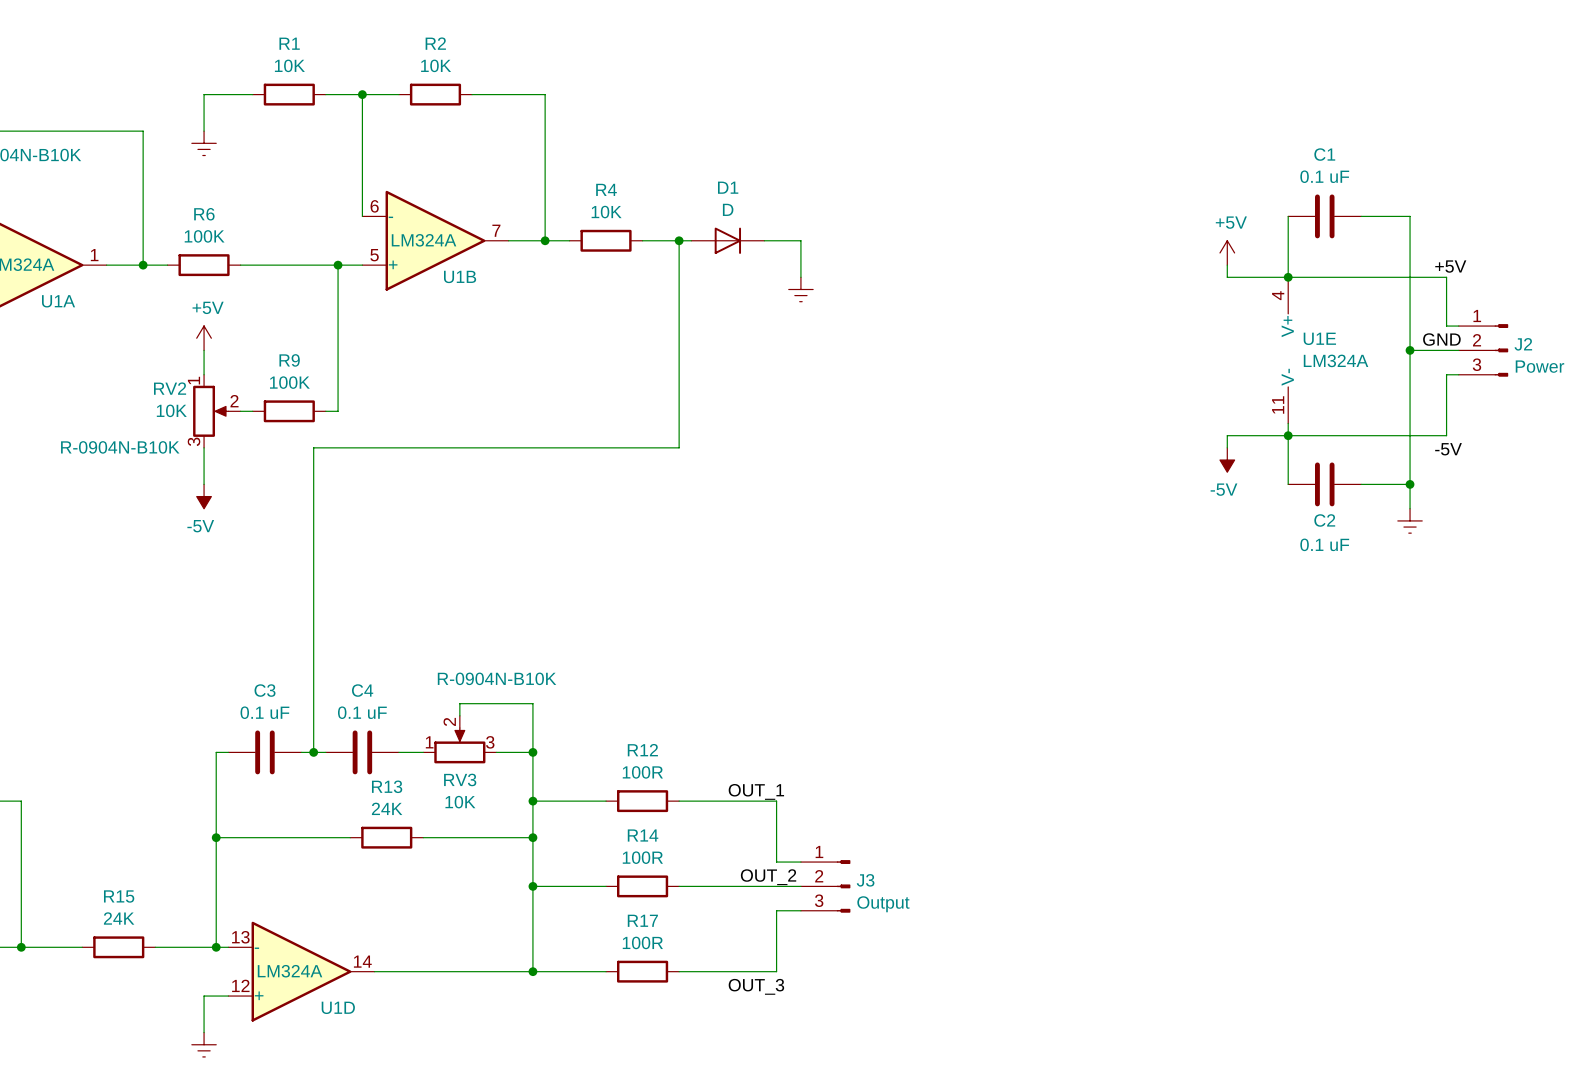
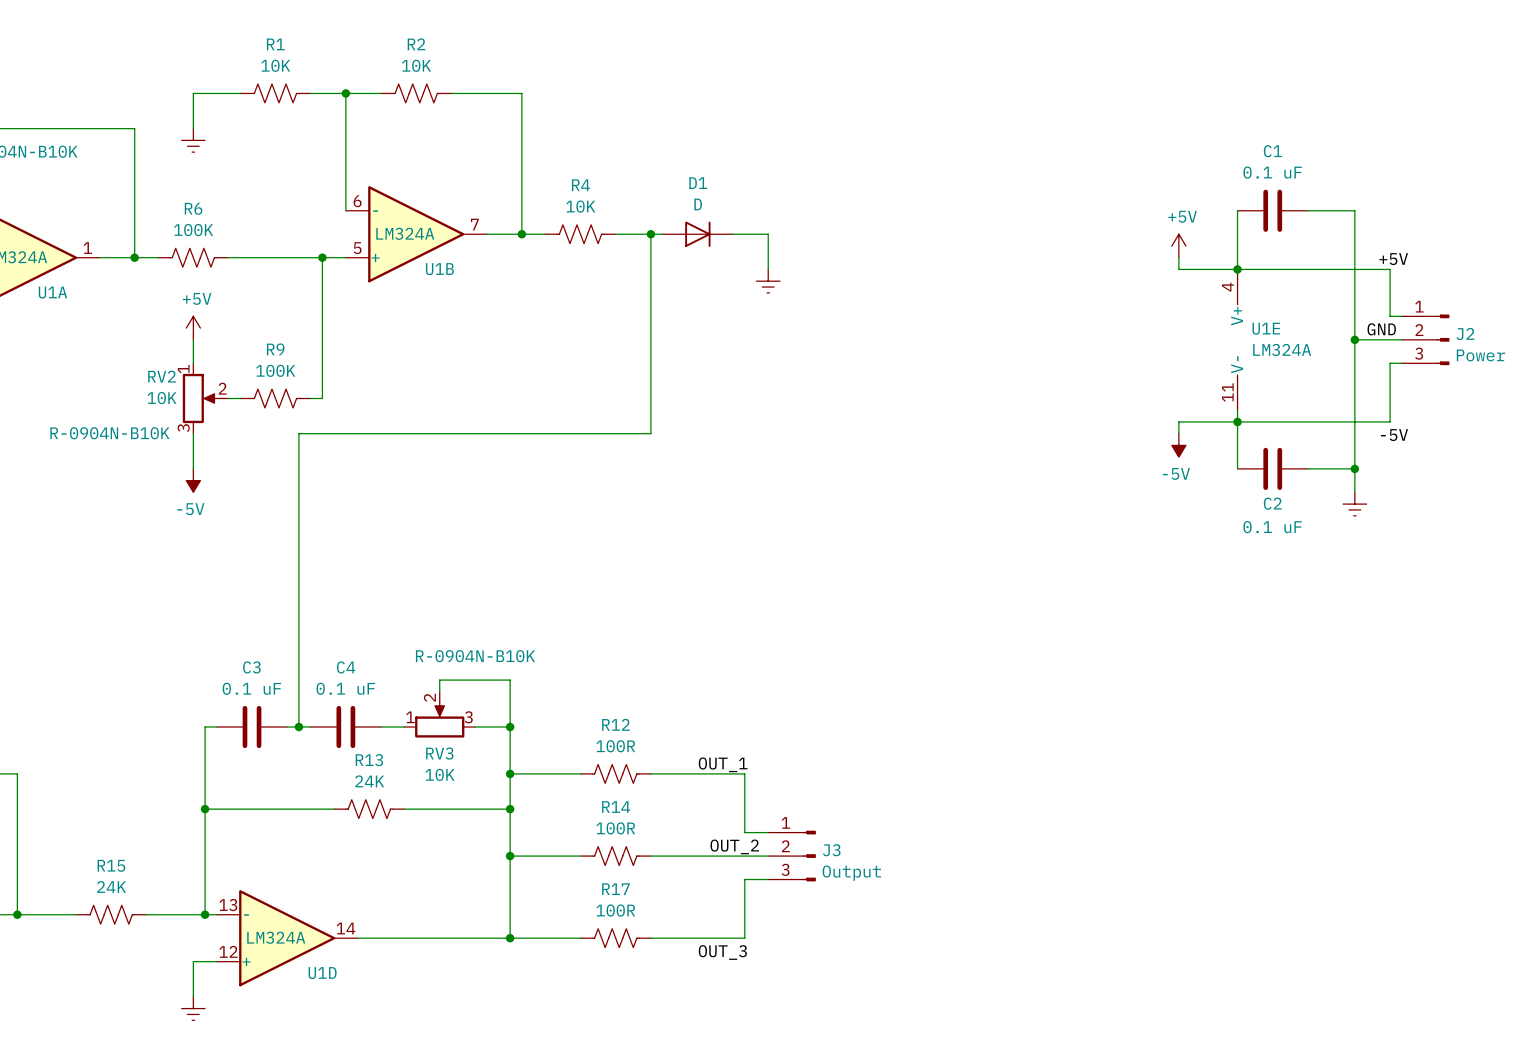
R1 symbol: [252, 83, 326, 106] -> [240, 84, 311, 103]
R2 symbol: [398, 83, 473, 106] -> [381, 84, 452, 103]
R4 symbol: [569, 229, 643, 252] -> [545, 224, 616, 244]
R6 symbol: [167, 254, 241, 277] -> [158, 248, 229, 268]
R9 symbol: [252, 400, 326, 423] -> [240, 389, 311, 408]
R12 symbol: [606, 790, 680, 813] -> [580, 764, 651, 784]
R13 symbol: [350, 826, 424, 849] -> [334, 799, 405, 819]
R14 symbol: [606, 875, 680, 898] -> [580, 846, 651, 866]
R15 symbol: [82, 936, 156, 959] -> [76, 905, 147, 925]
R17 symbol: [606, 960, 680, 983] -> [580, 928, 651, 948]

